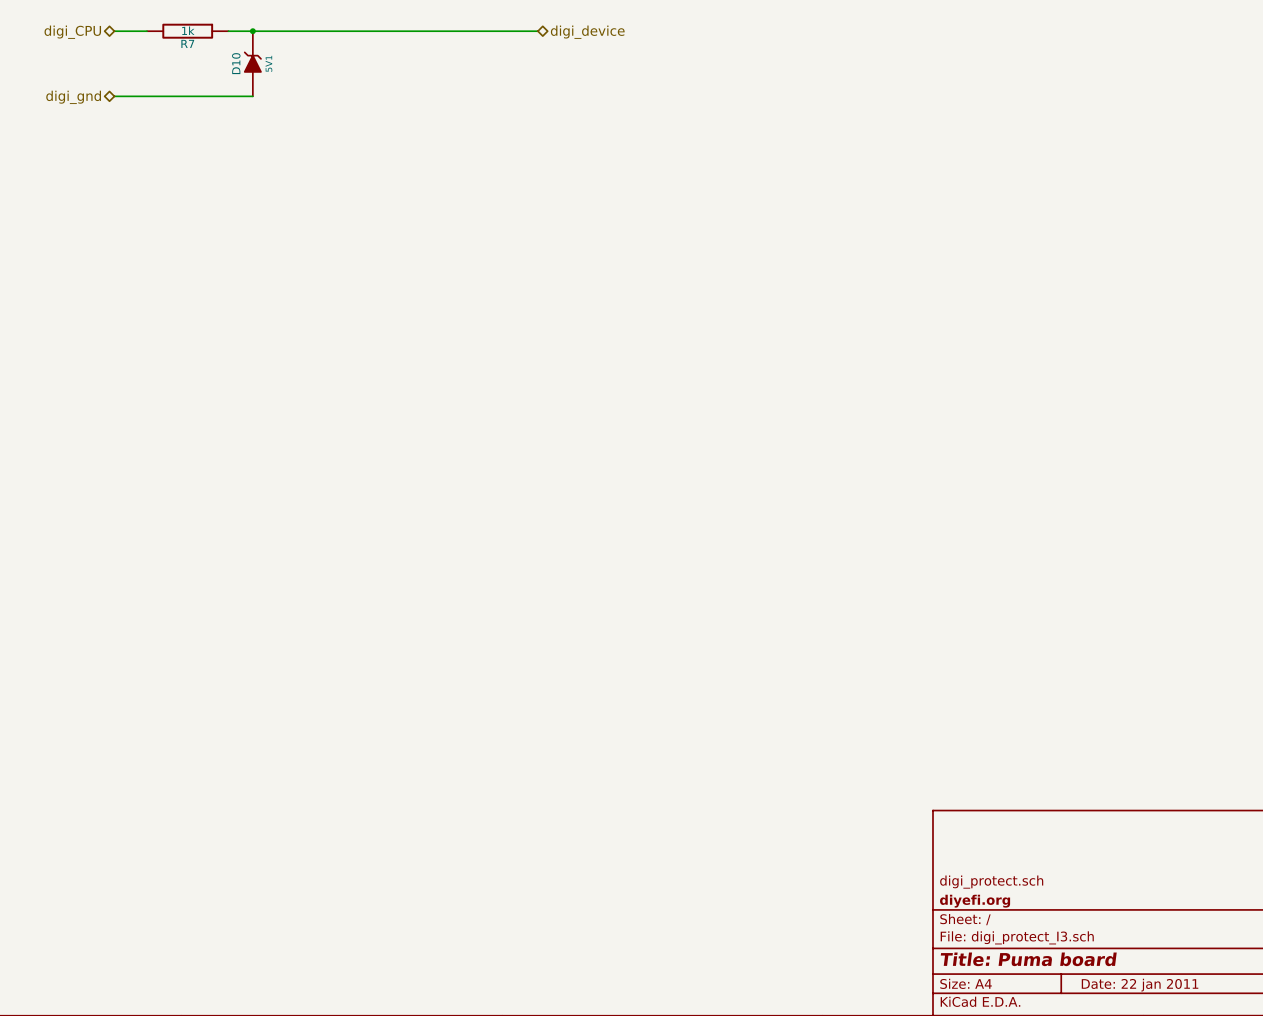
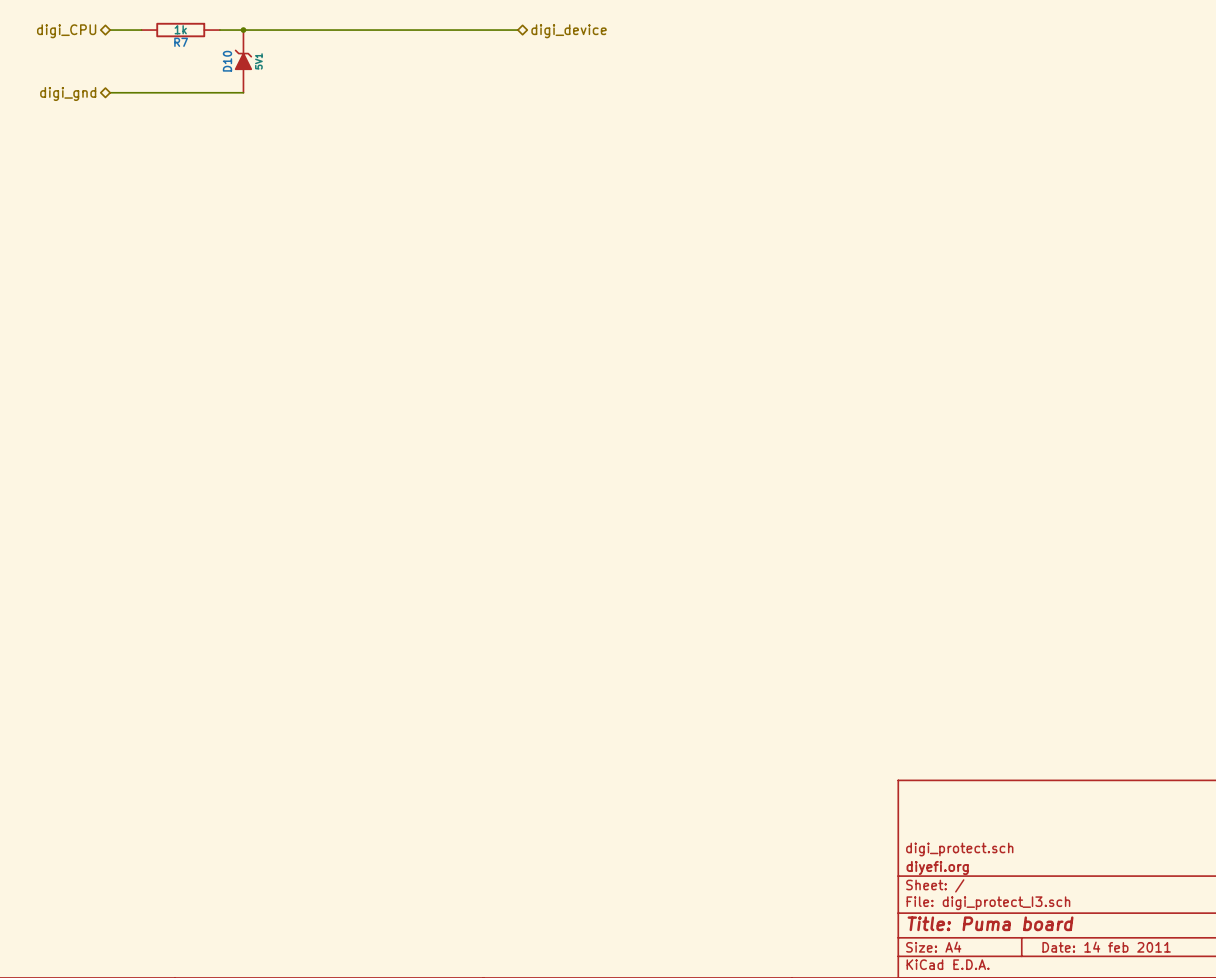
title block: Date: 22 jan 2011 (1140, 985) -> Date: 14 feb 2011 (1106, 947)

